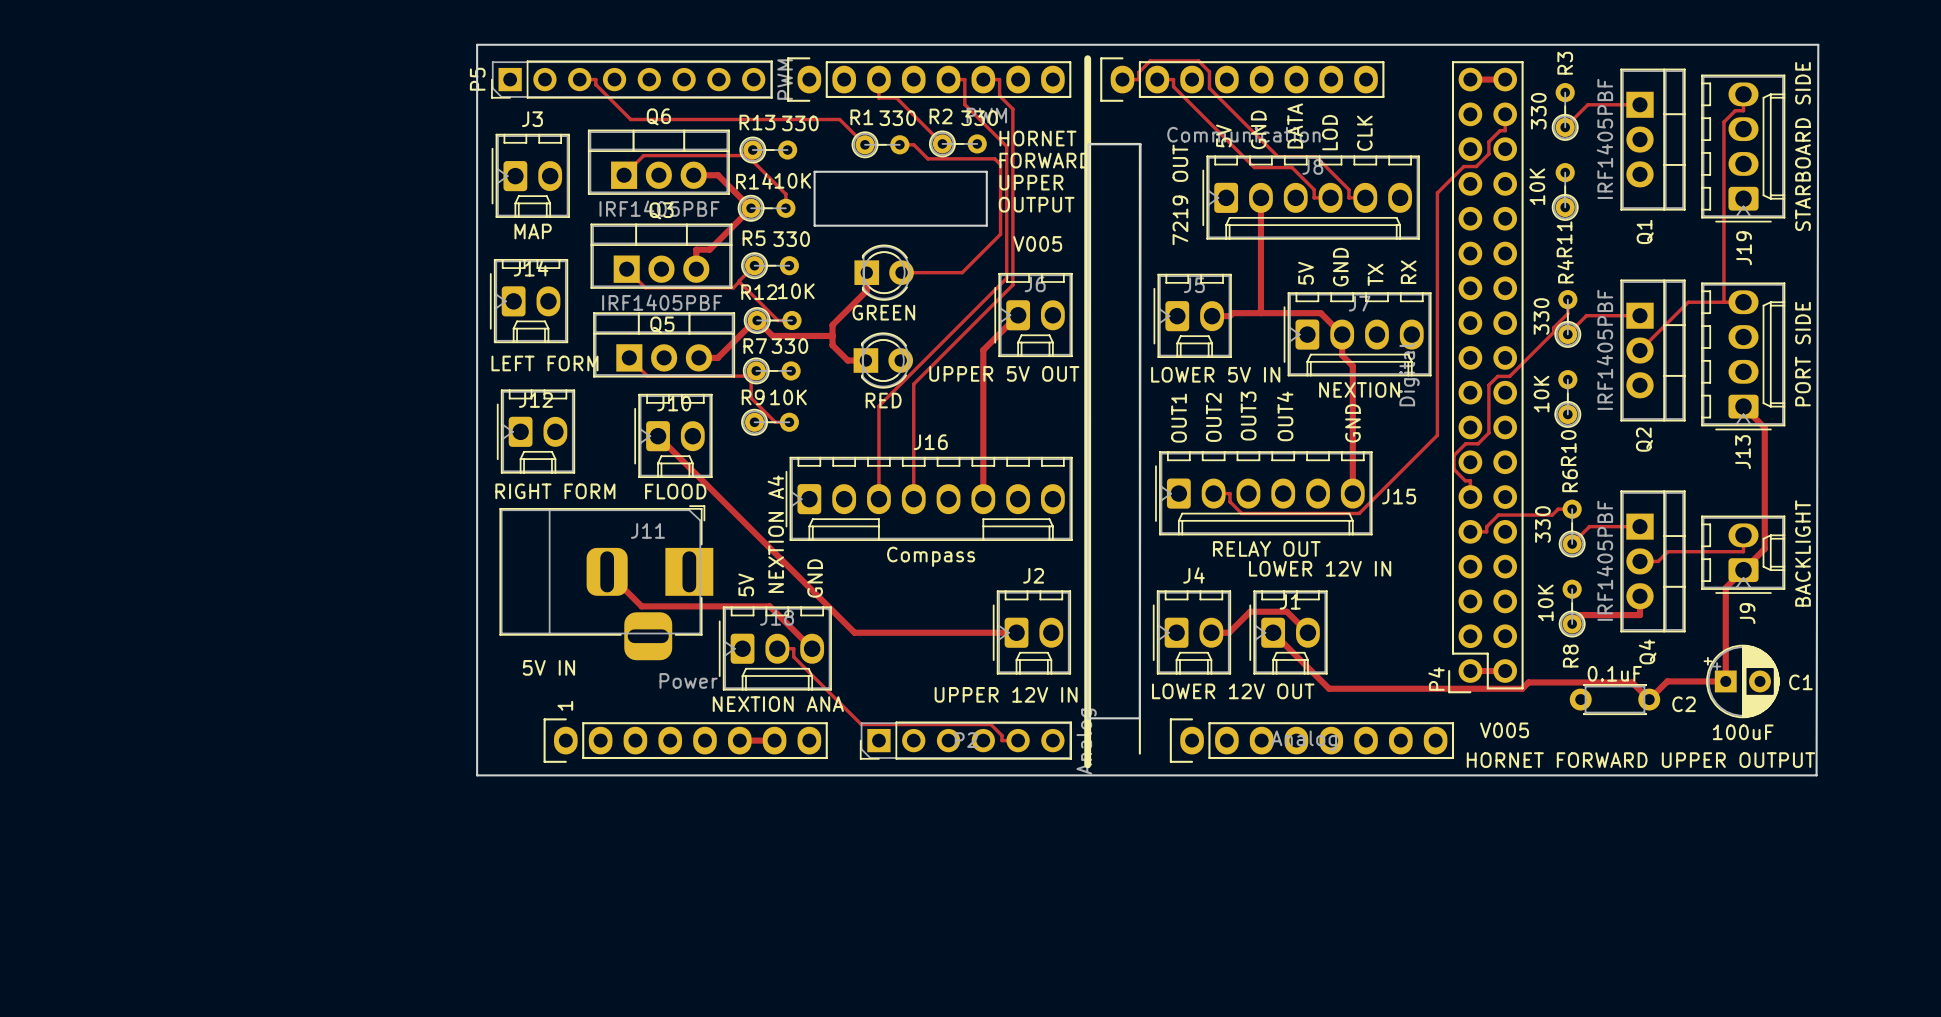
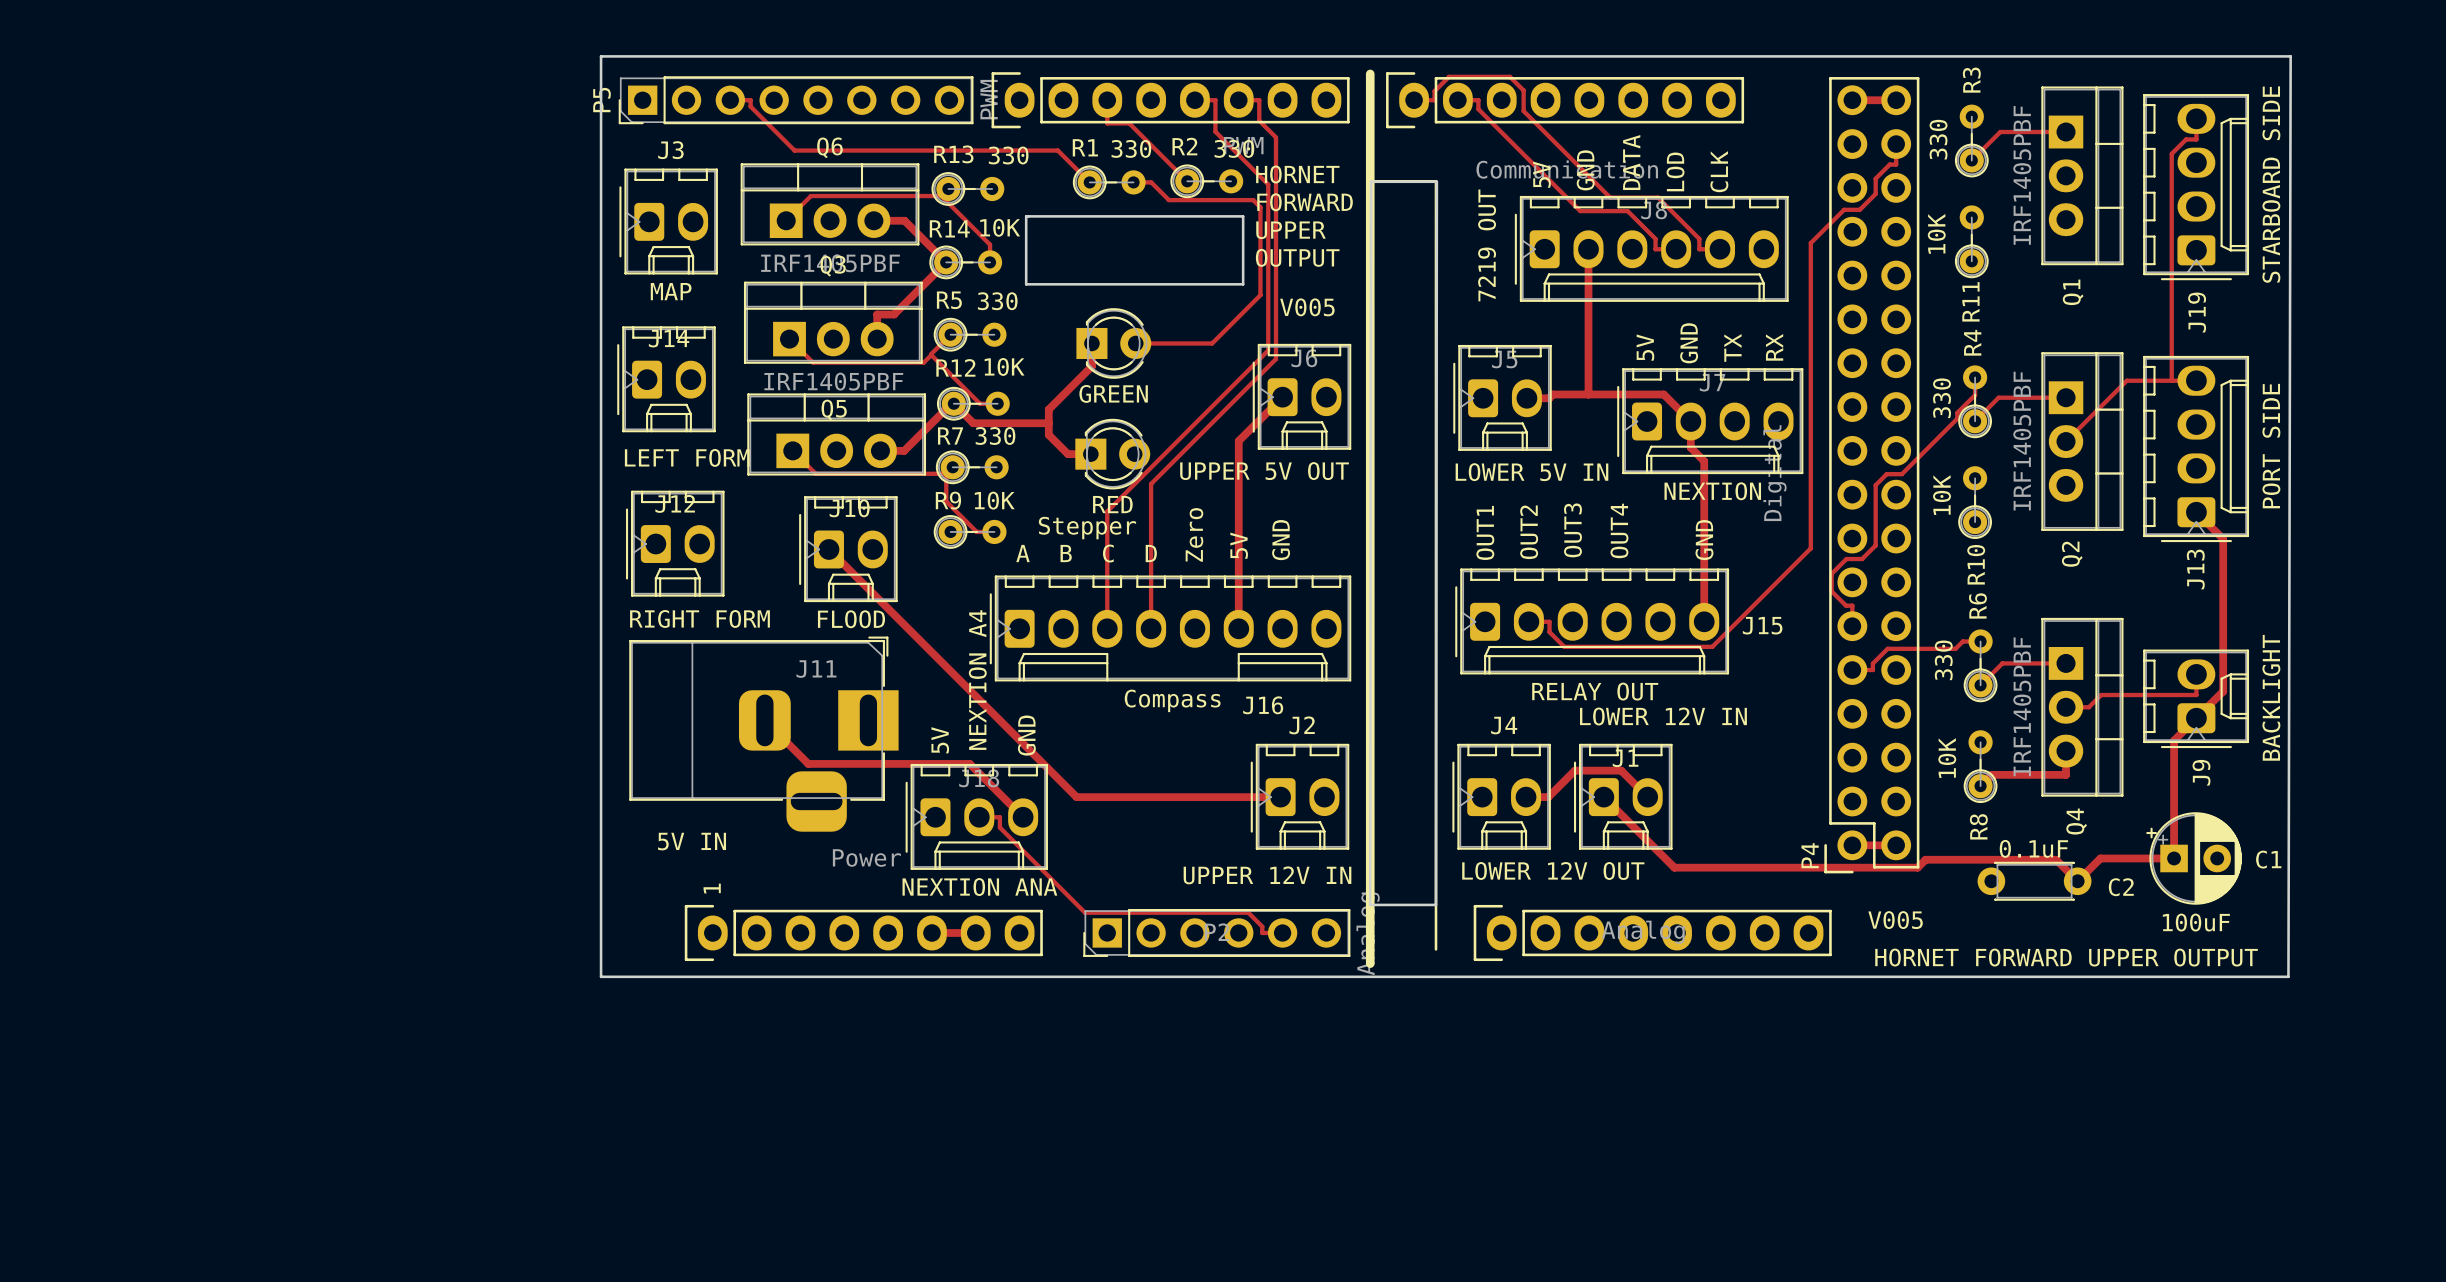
text: none -> Stepper (1087, 528)
text: none -> GND (1281, 540)
text: none -> Zero (1194, 534)
text: none -> 5V (1239, 545)
text: none -> A B C D (1086, 553)
J16 name position: J16 (930, 442) -> J16 (1263, 705)

